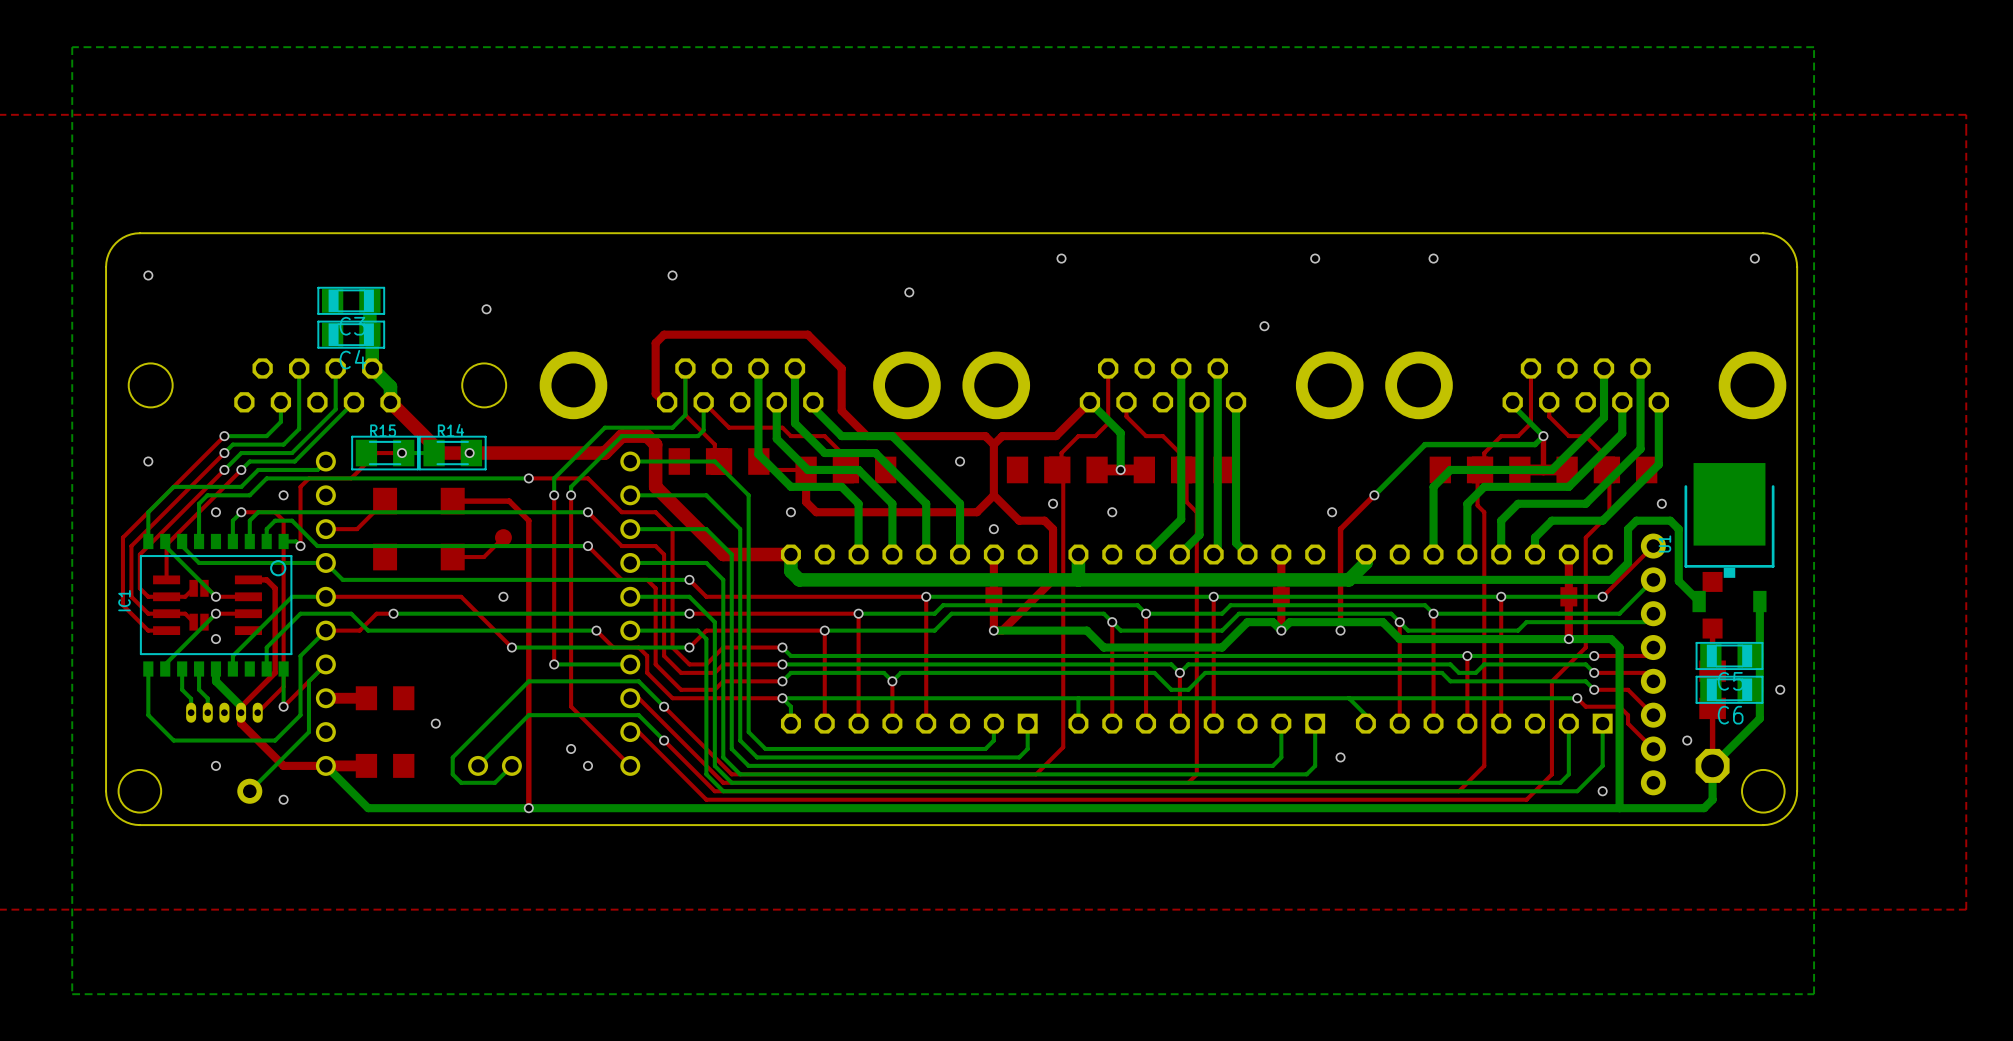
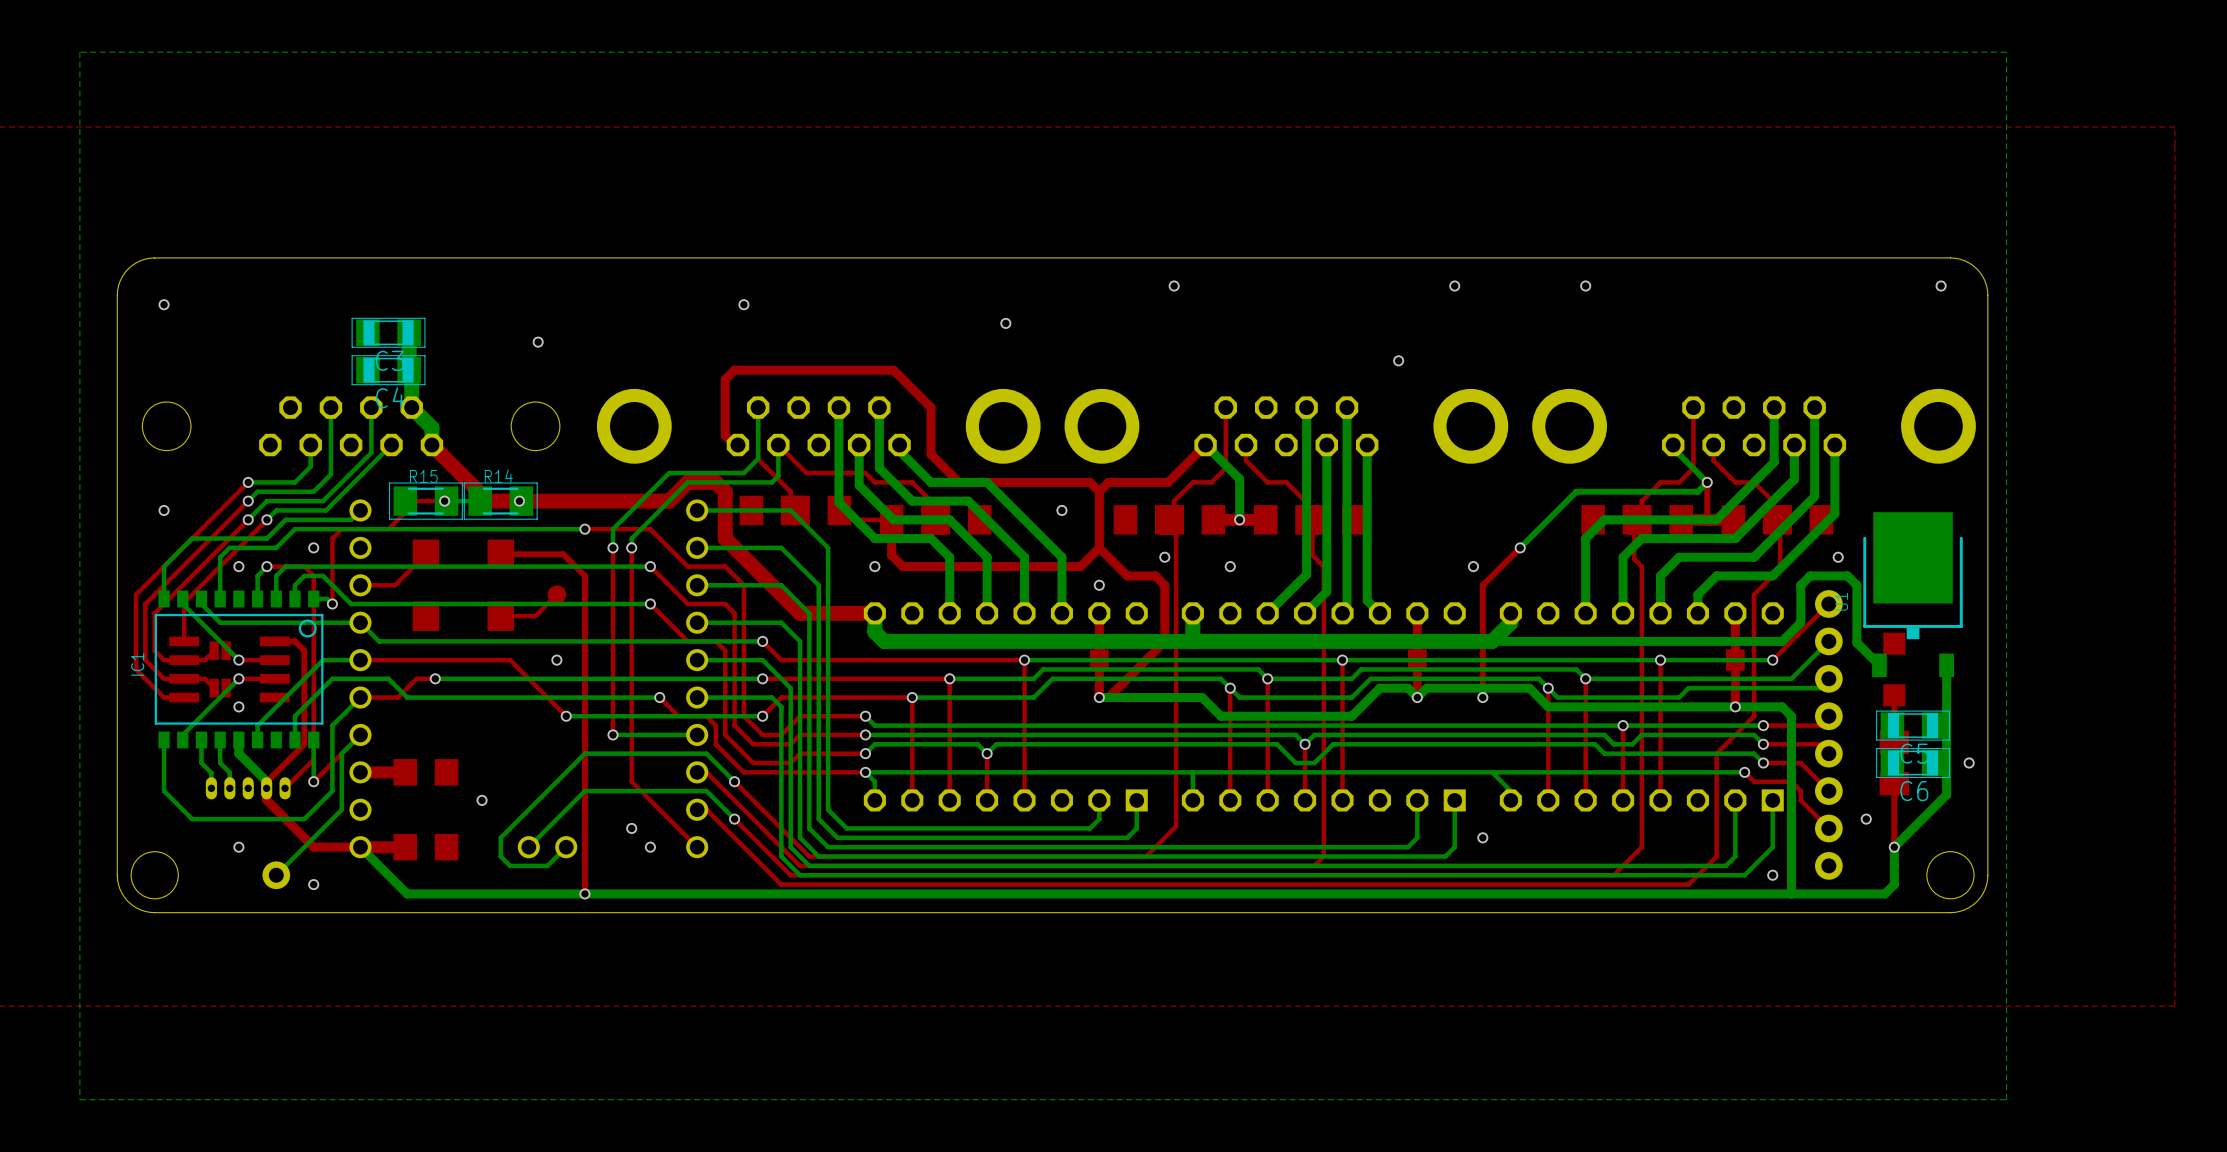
part: (1712, 765) -> none
via: none -> (1894, 847)

